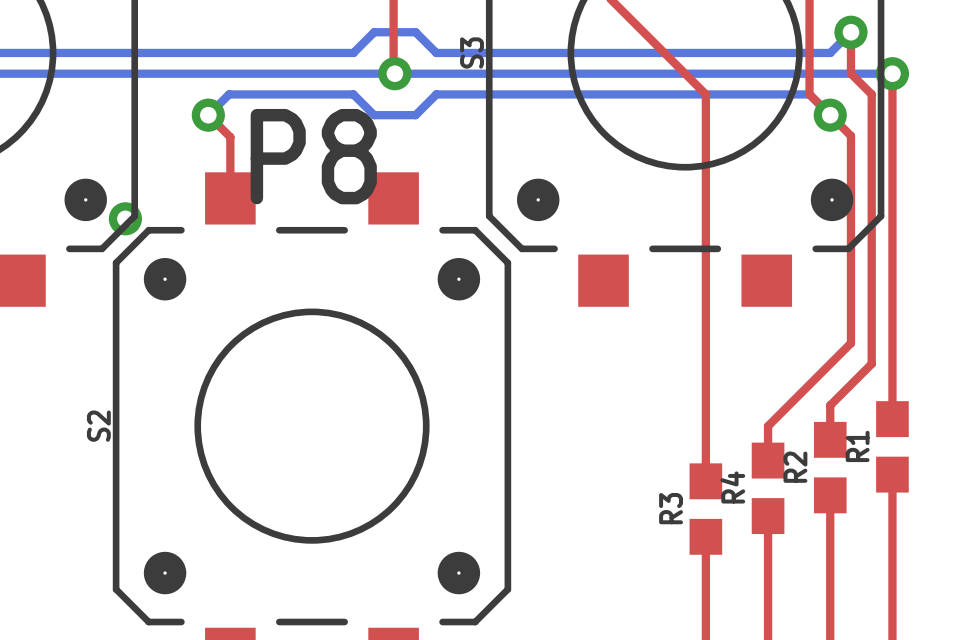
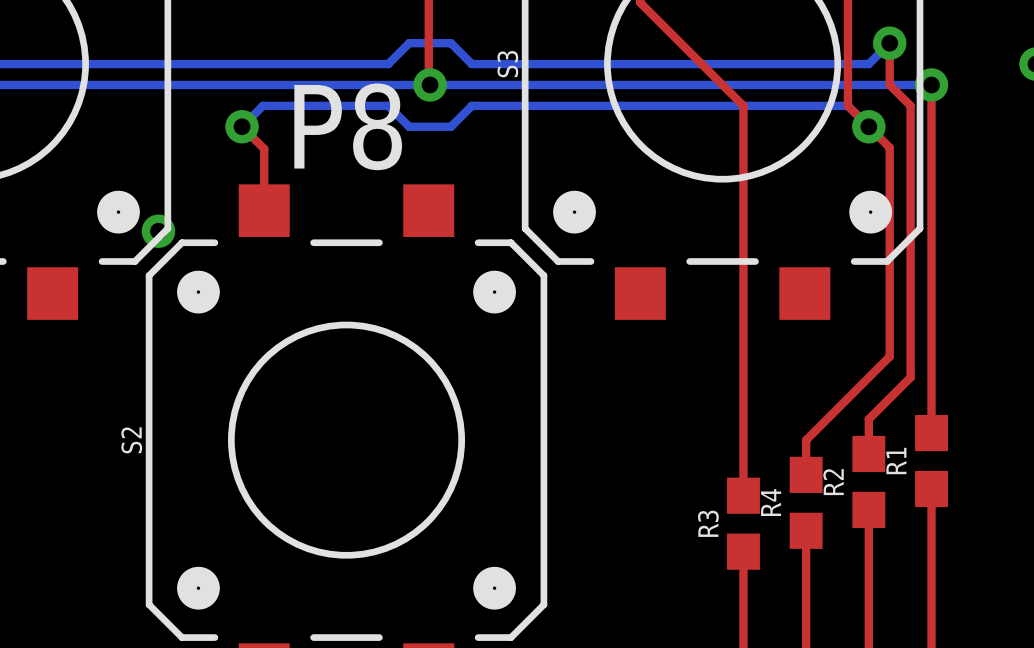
text position: P8 (313, 156) -> P8 (348, 126)

